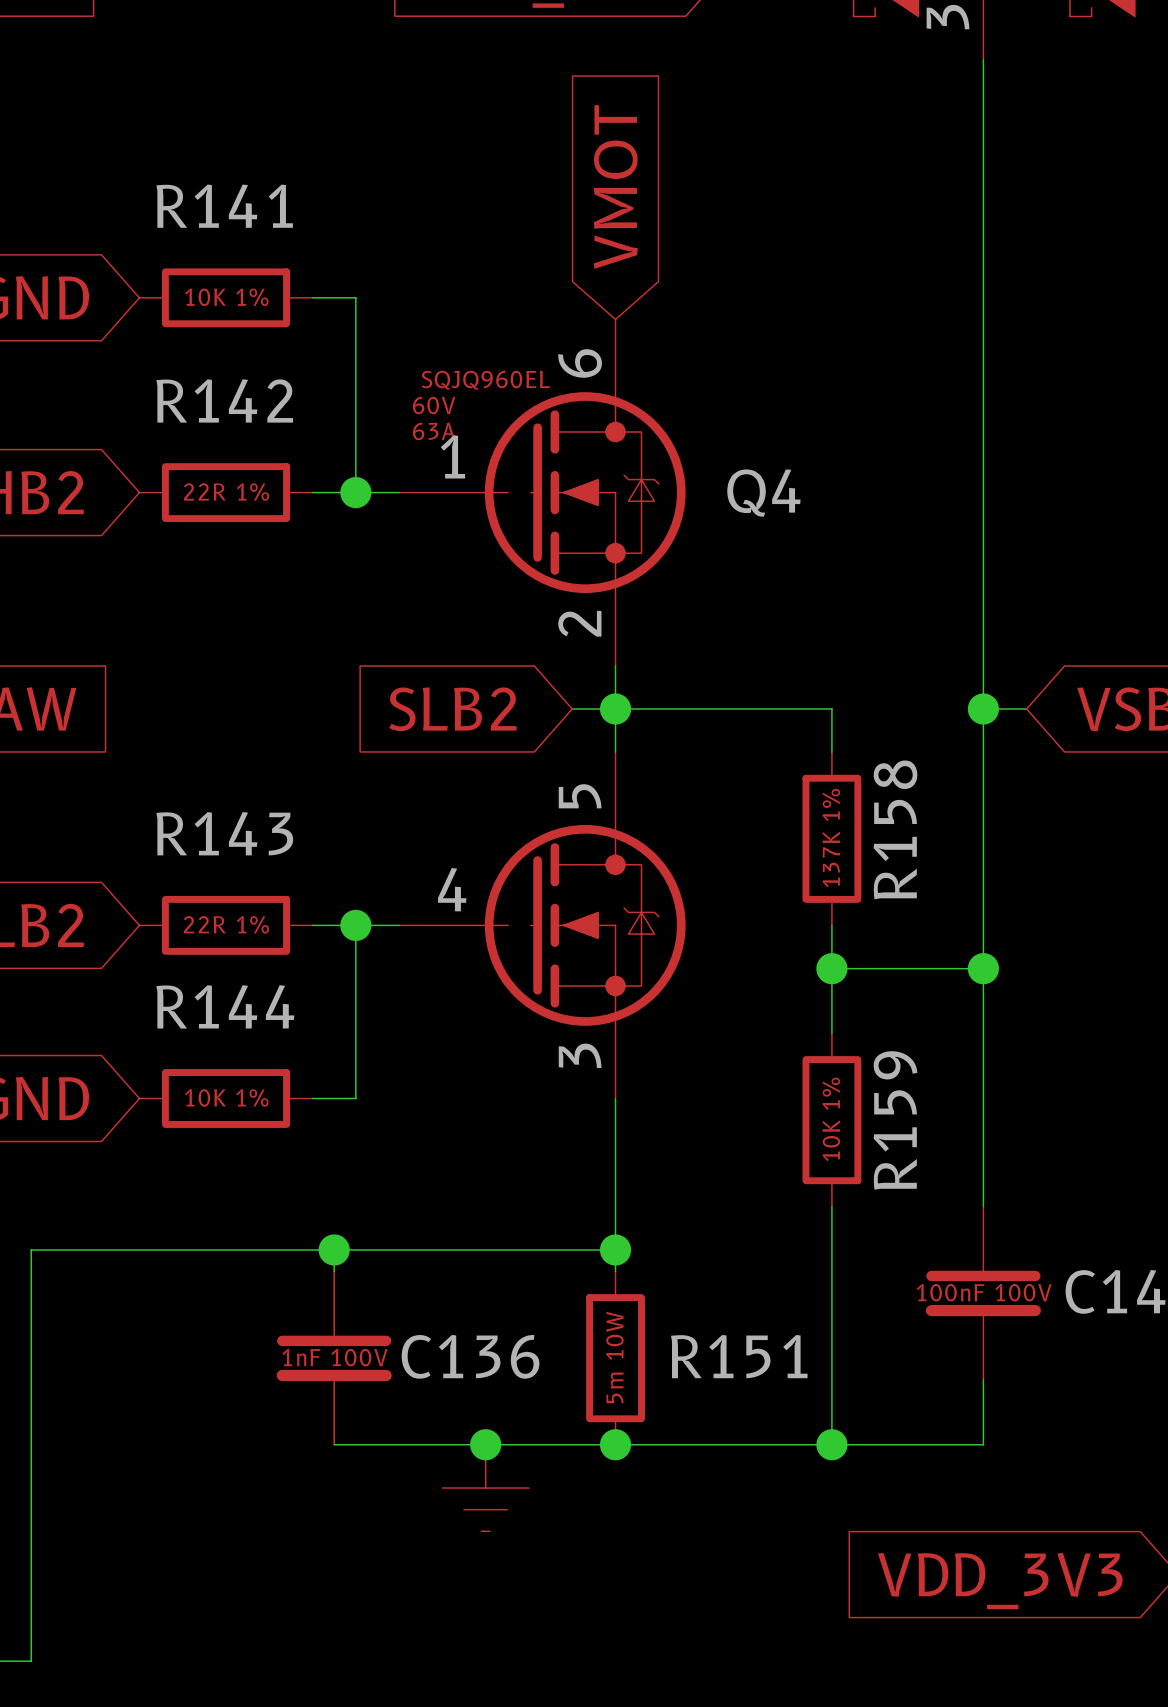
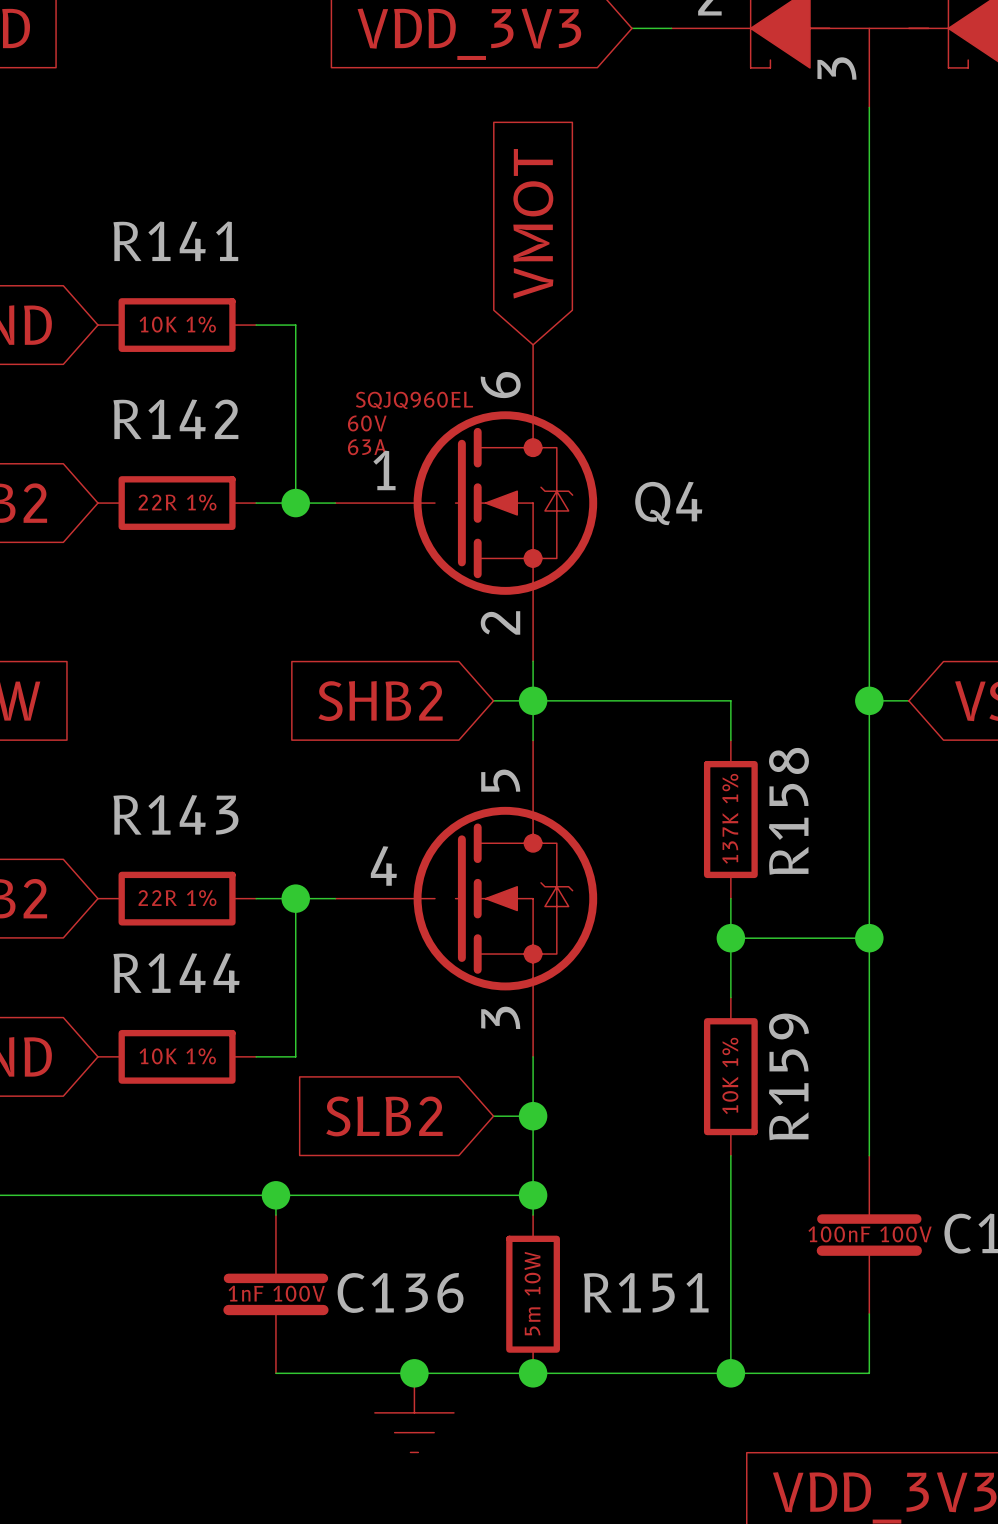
global label: SLB2 (452, 709) -> SHB2 (380, 701)
global label: none -> SLB2 (384, 1116)
wire: none -> (493, 1116) (533, 1116)
junction: none -> (533, 1116)

